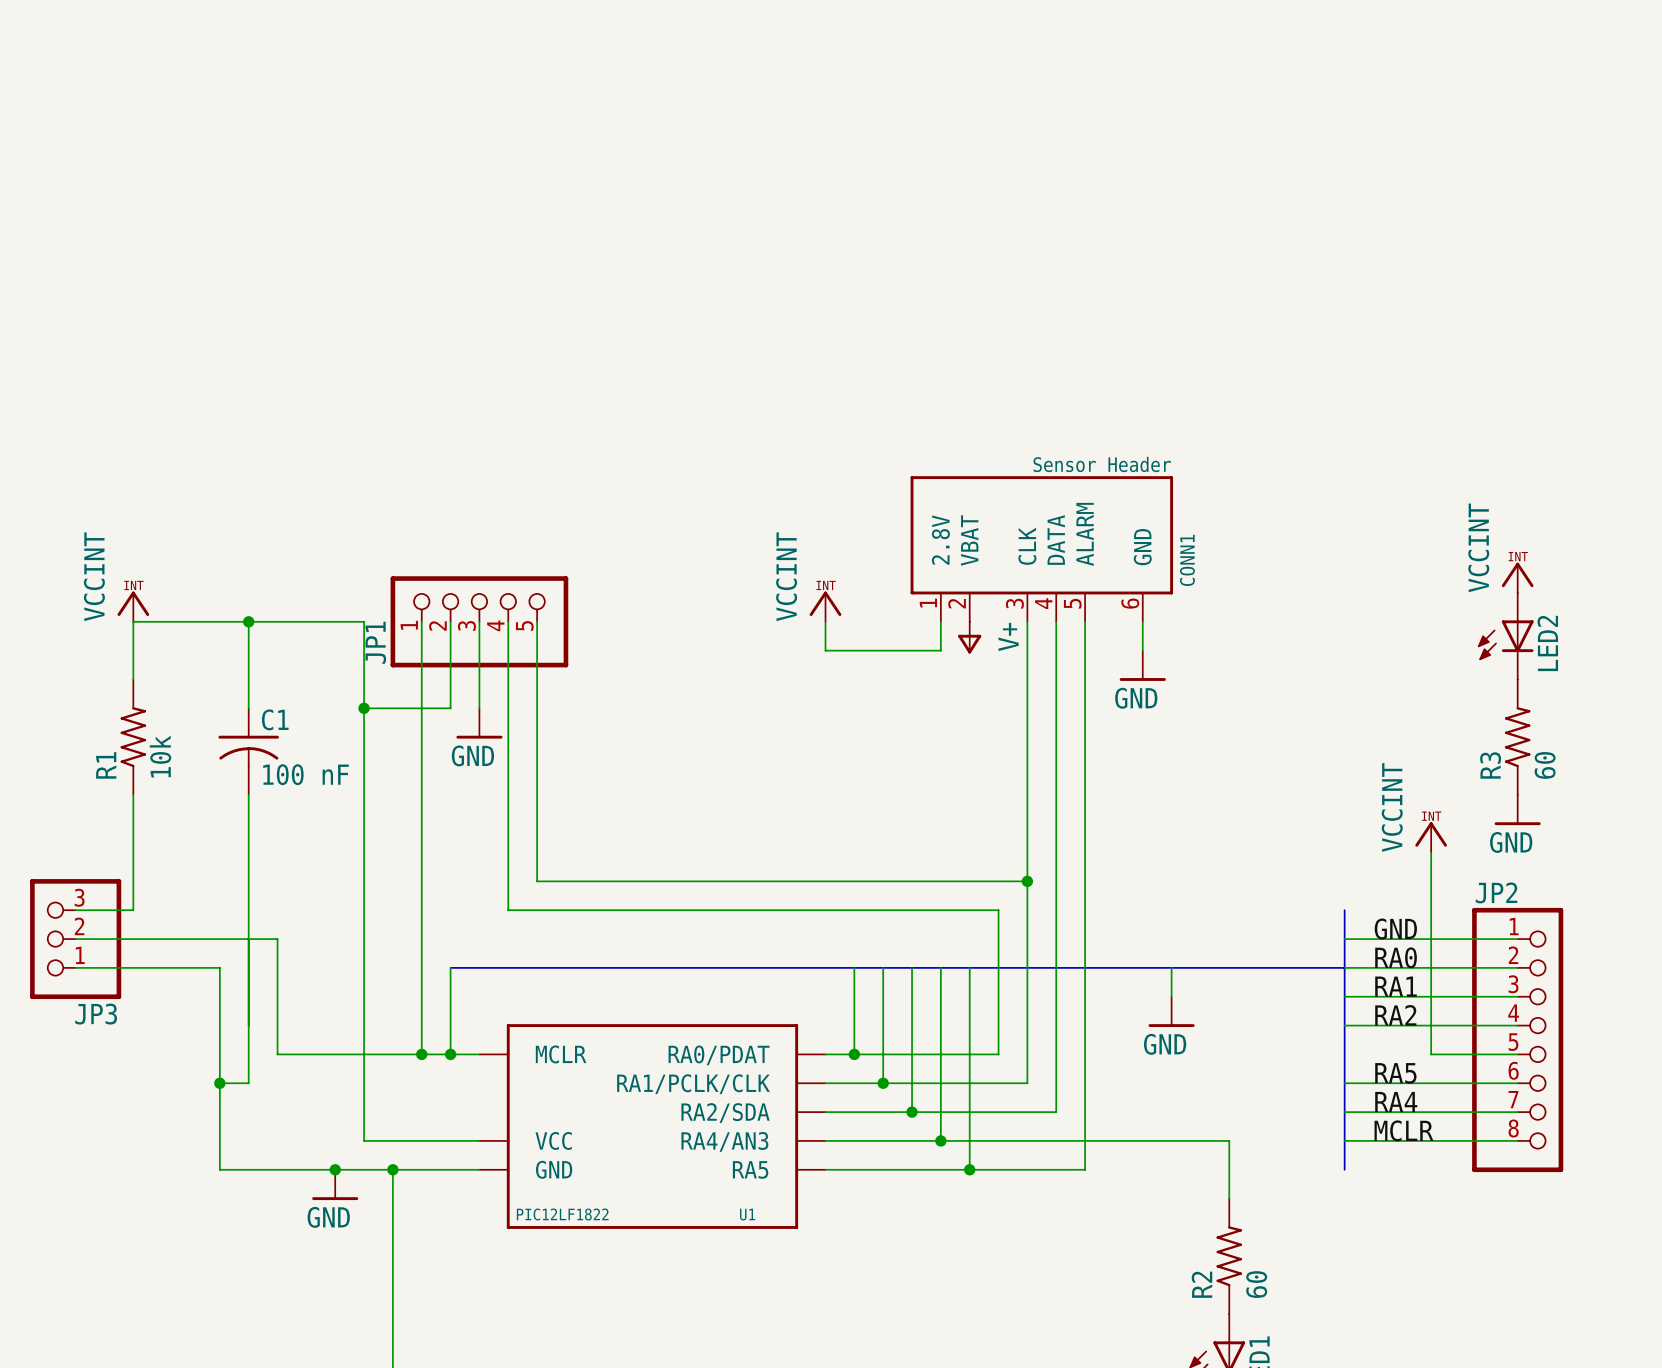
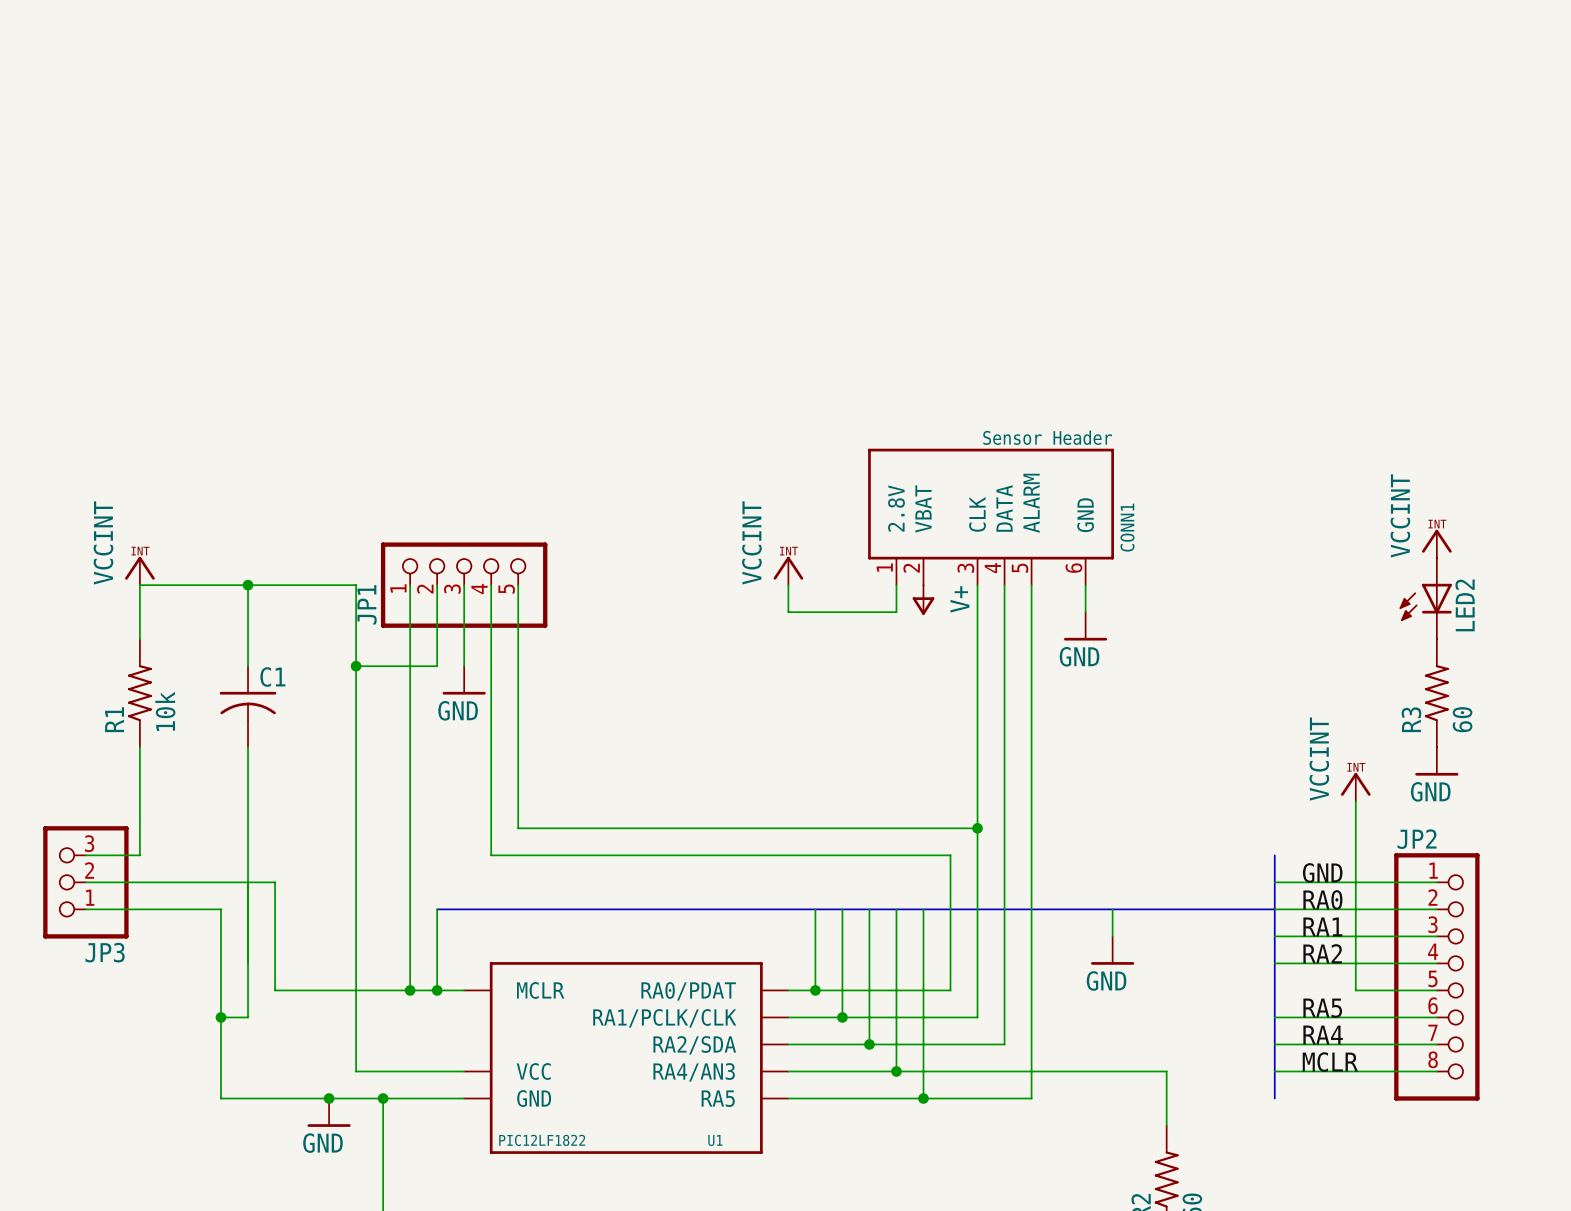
C1 value: 100 nF (306, 774) -> none

